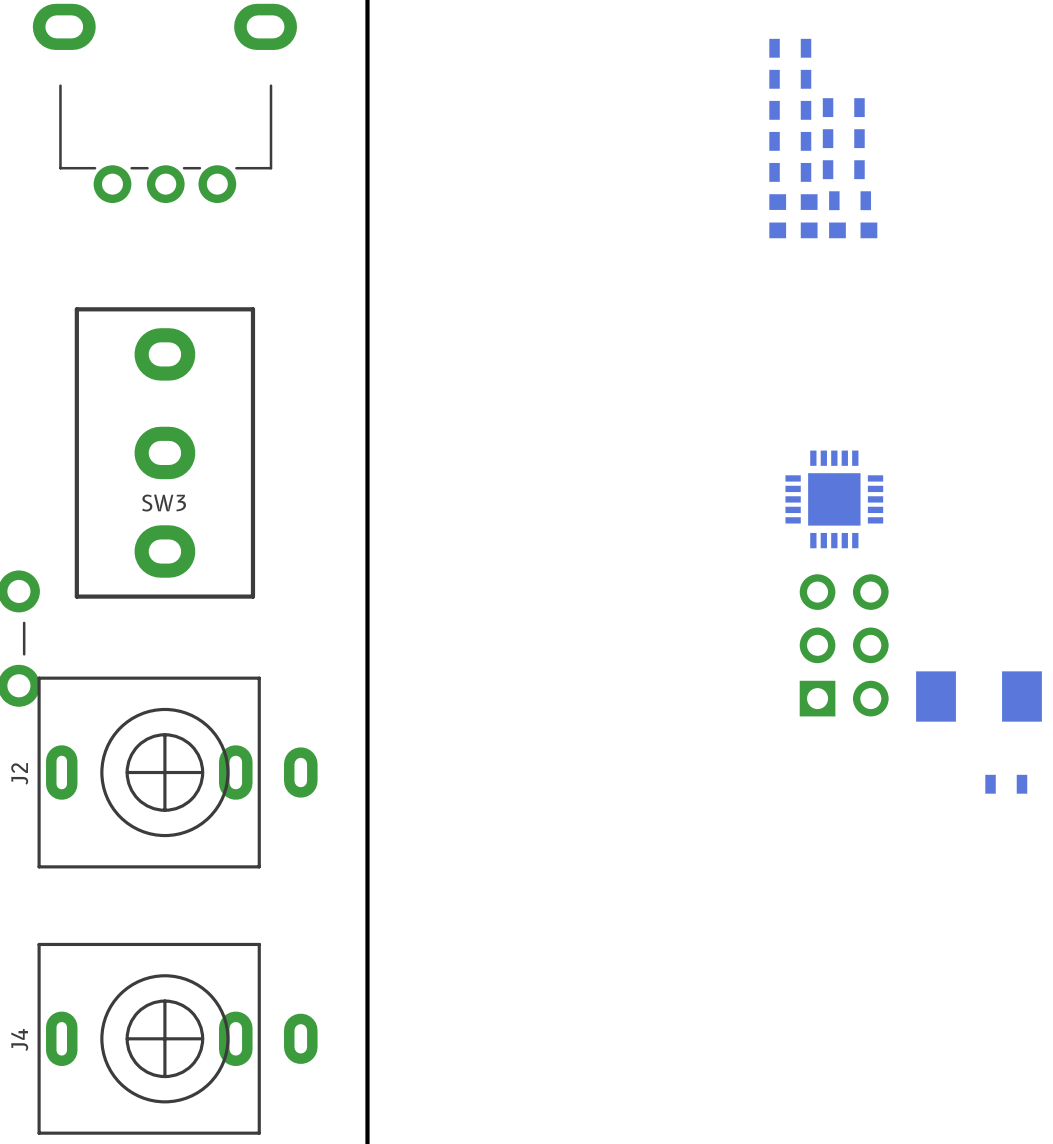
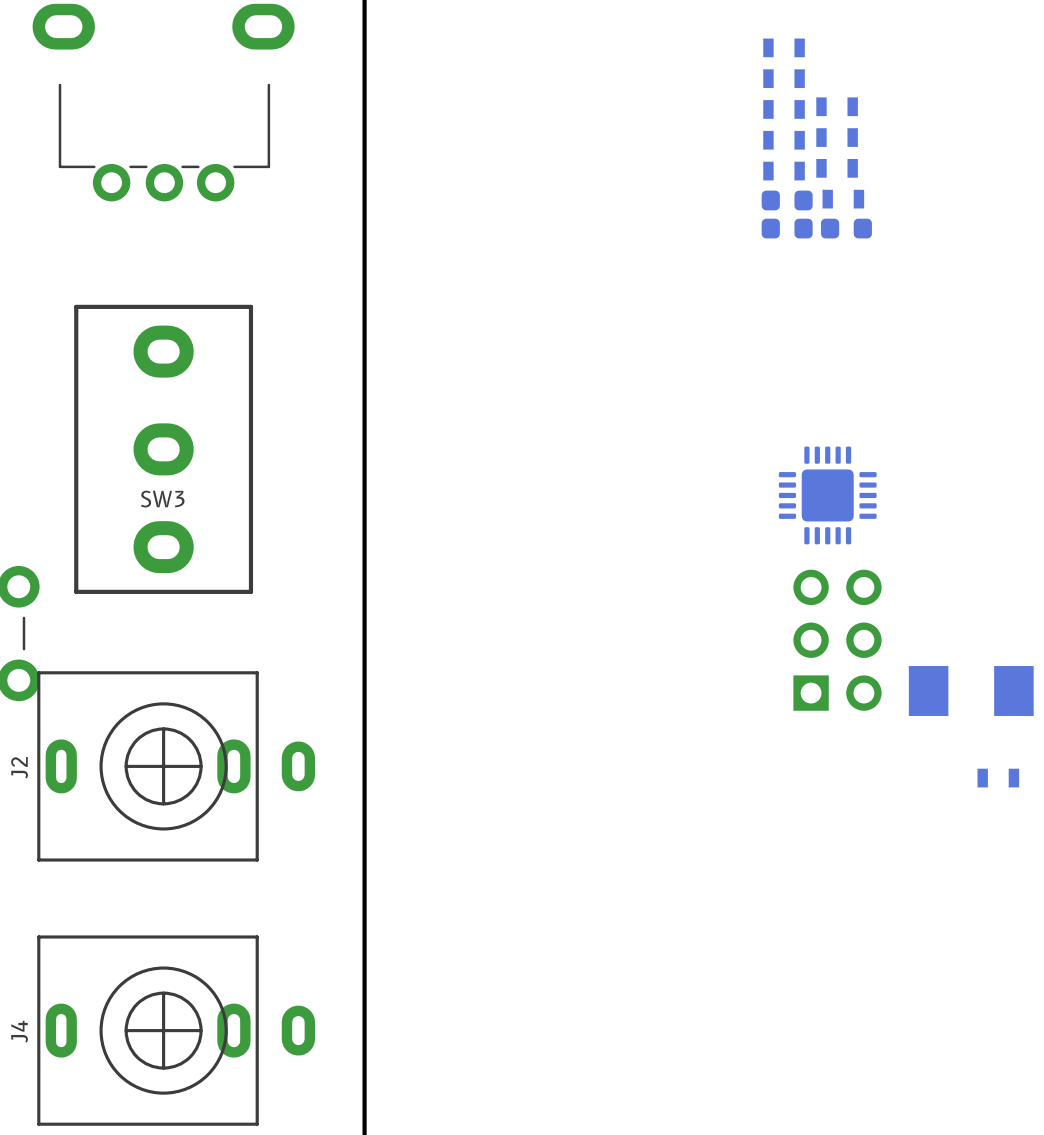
part footprint: [769, 194, 818, 210] -> [761, 190, 813, 211]
part footprint: [769, 222, 818, 239] -> [761, 218, 813, 239]
part footprint: [829, 222, 878, 239] -> [820, 218, 872, 239]
part footprint: [785, 450, 884, 549] -> [778, 446, 877, 545]

